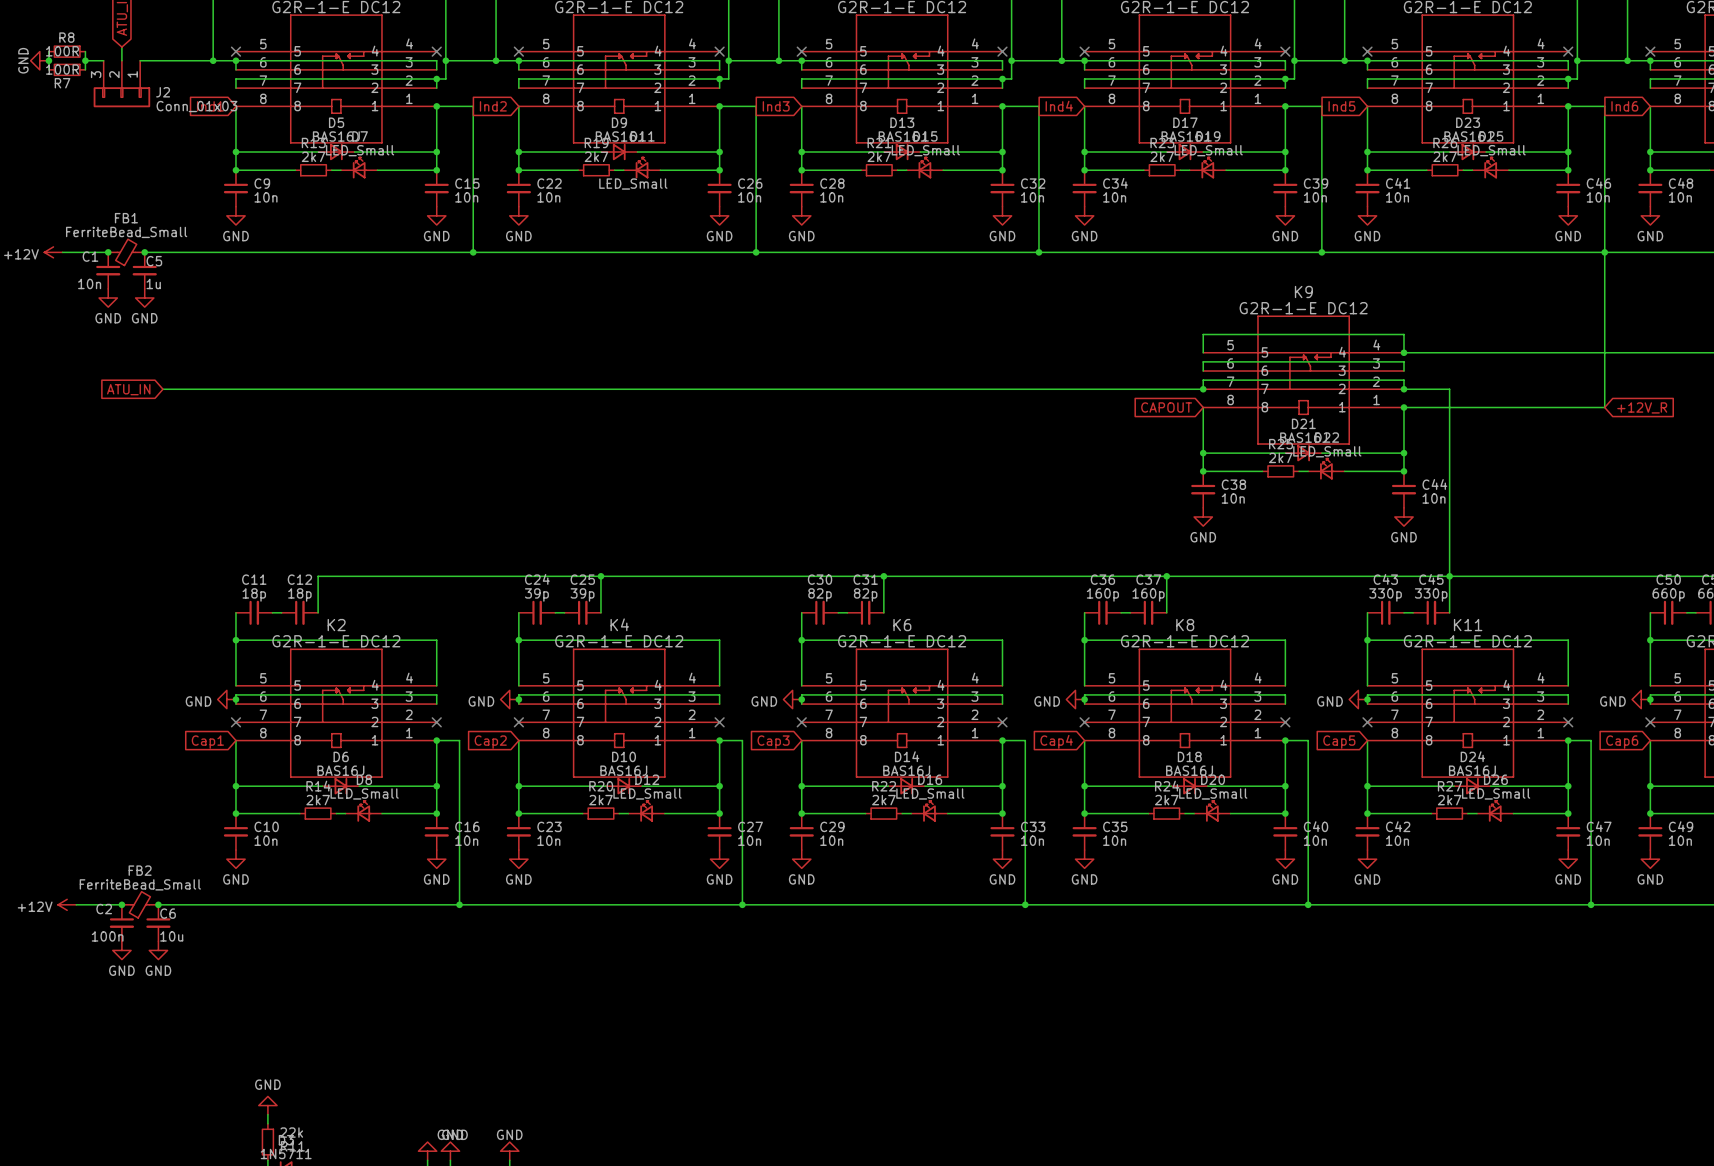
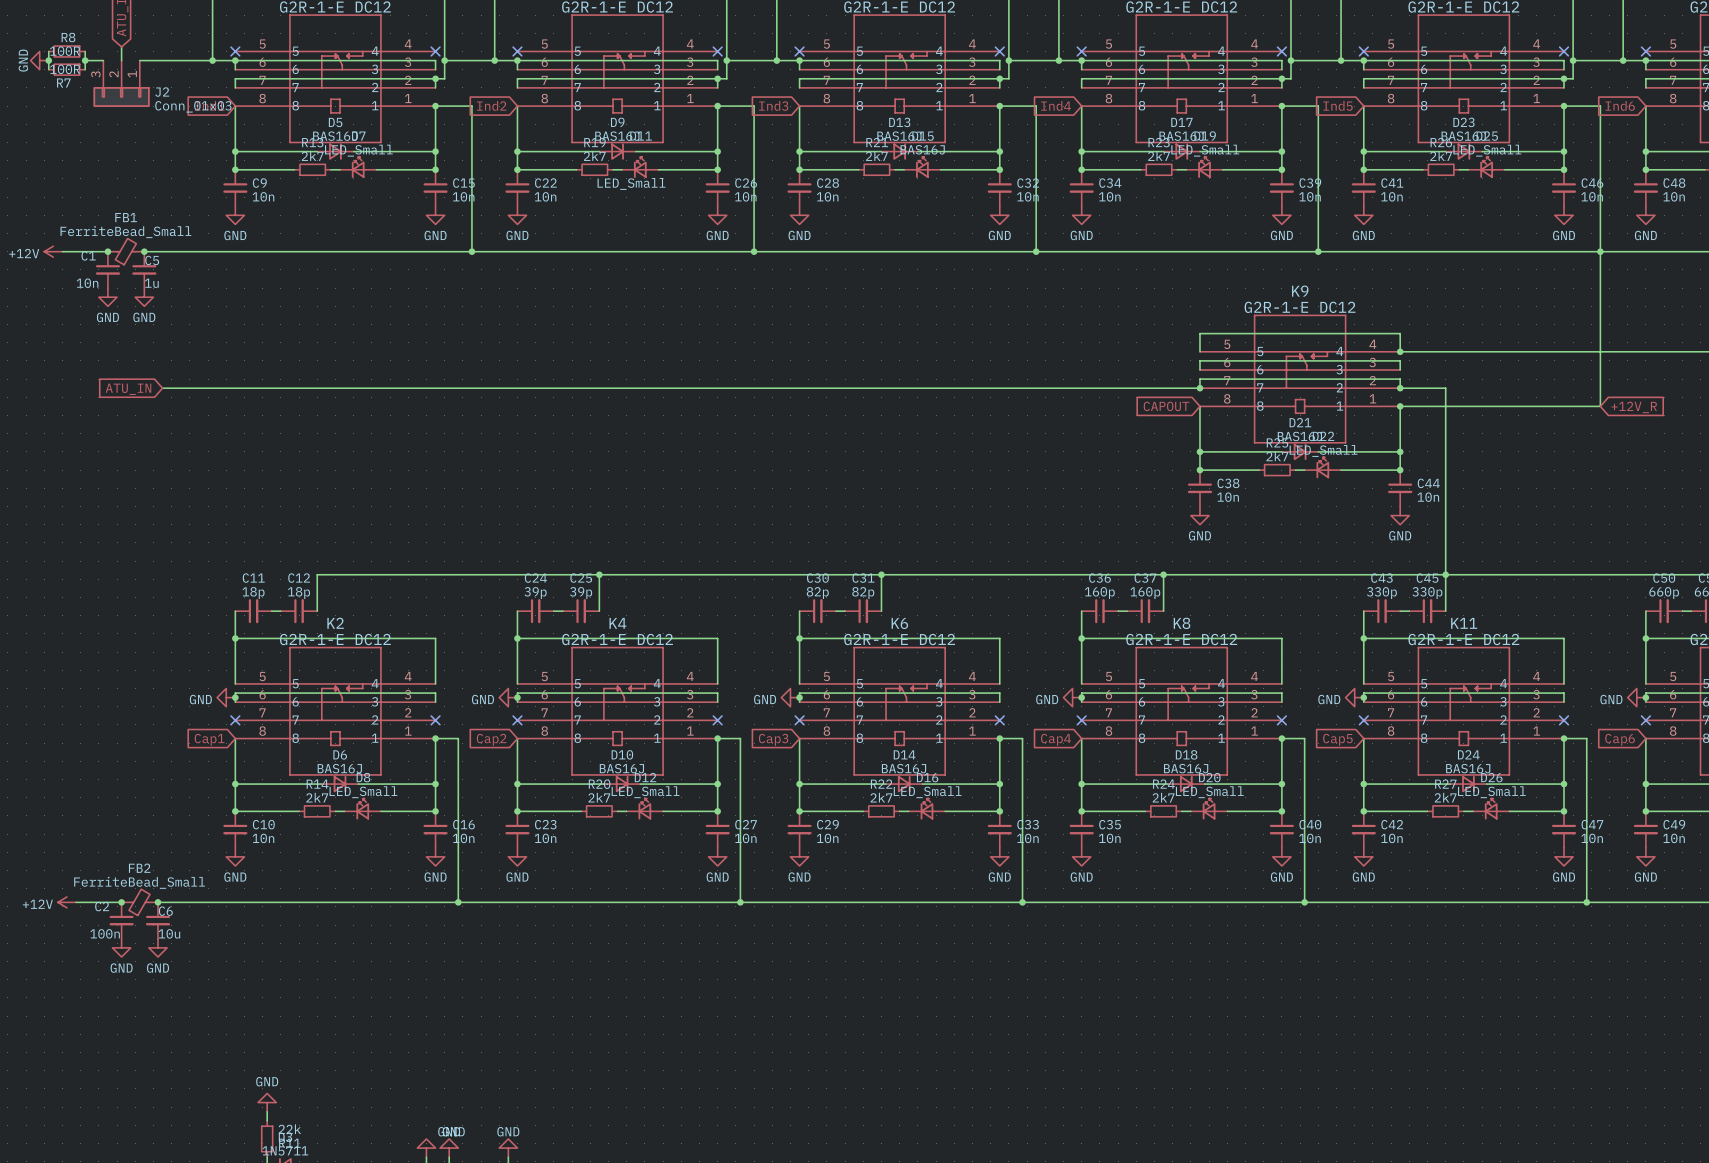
D15 value: LED_Small (925, 150) -> BAS16J (922, 149)

